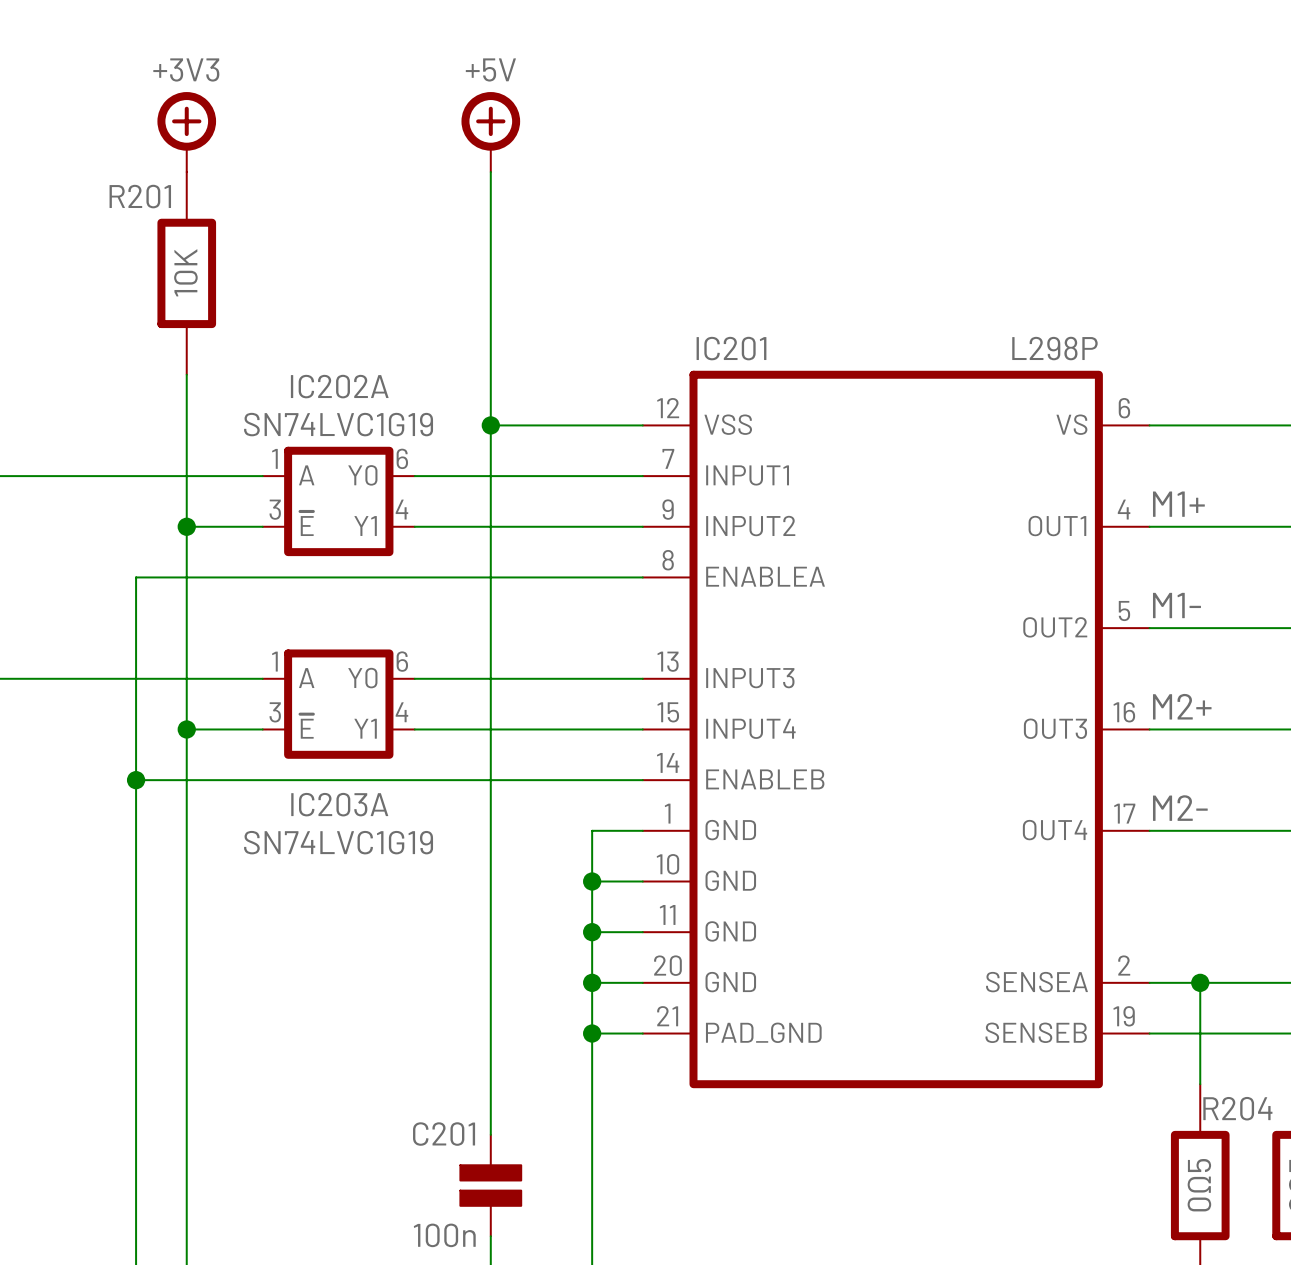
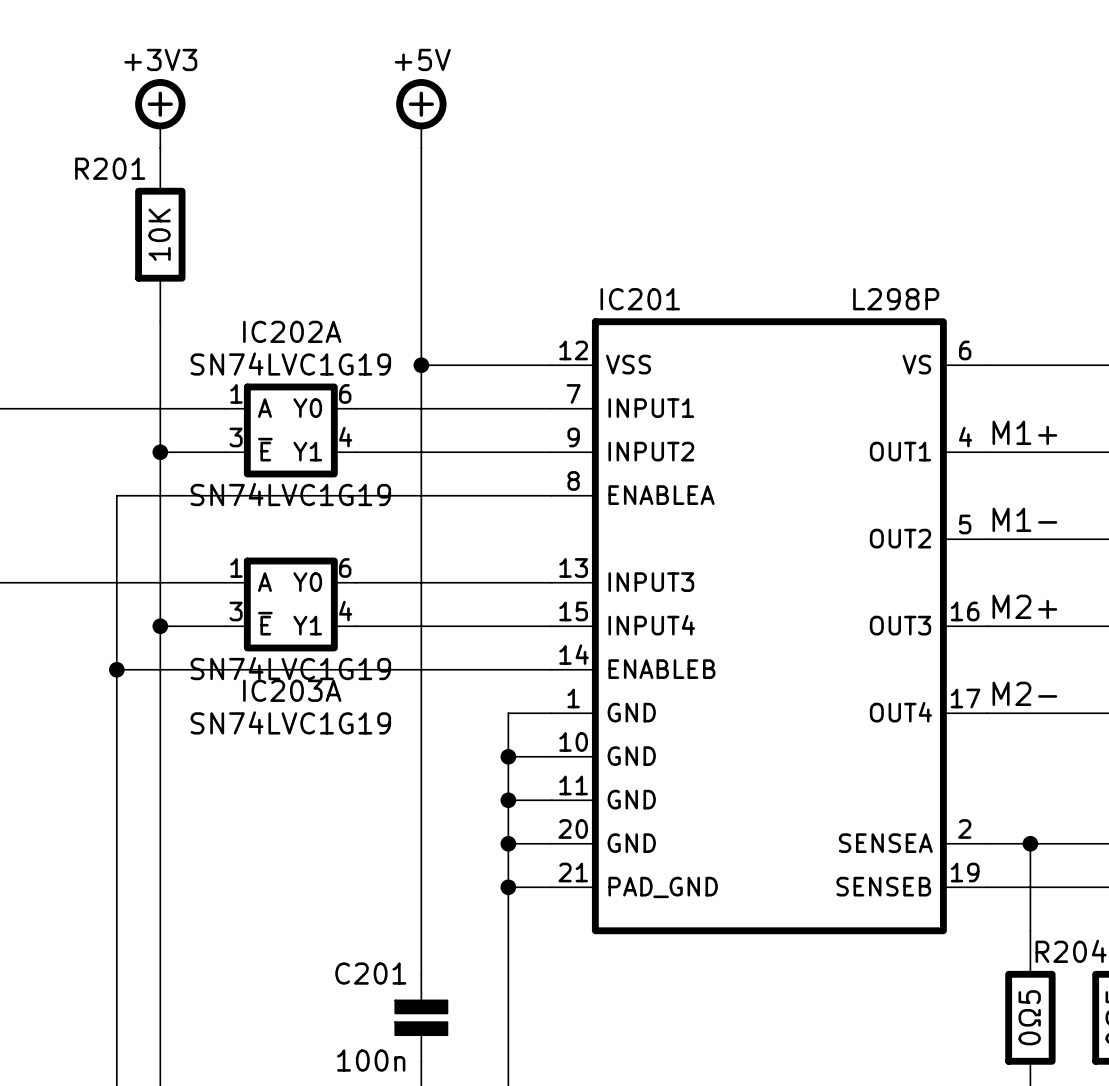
IC202A text: none -> SN74LVC1G19 (290, 494)
IC203A text: none -> SN74LVC1G19 (290, 668)

